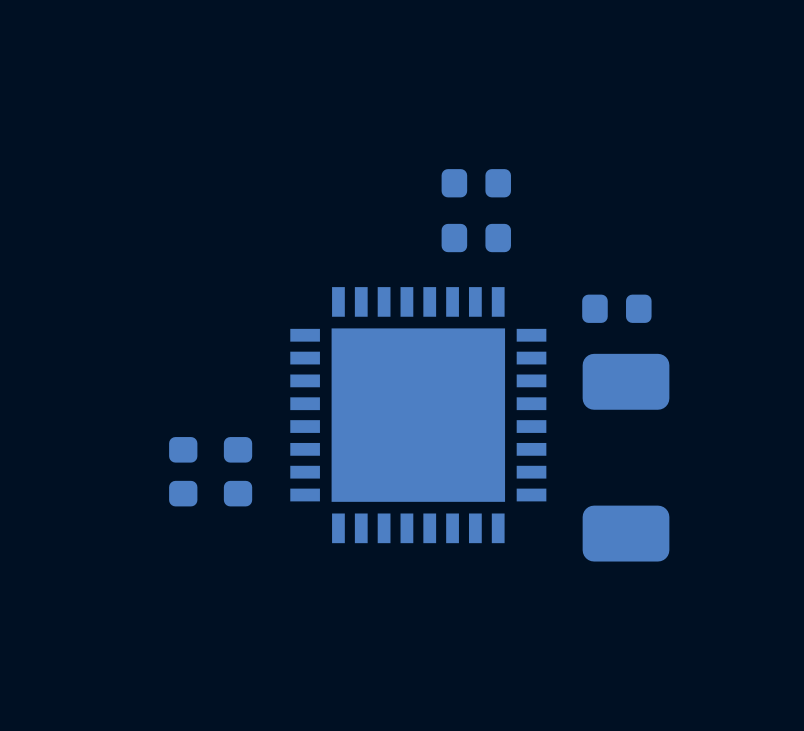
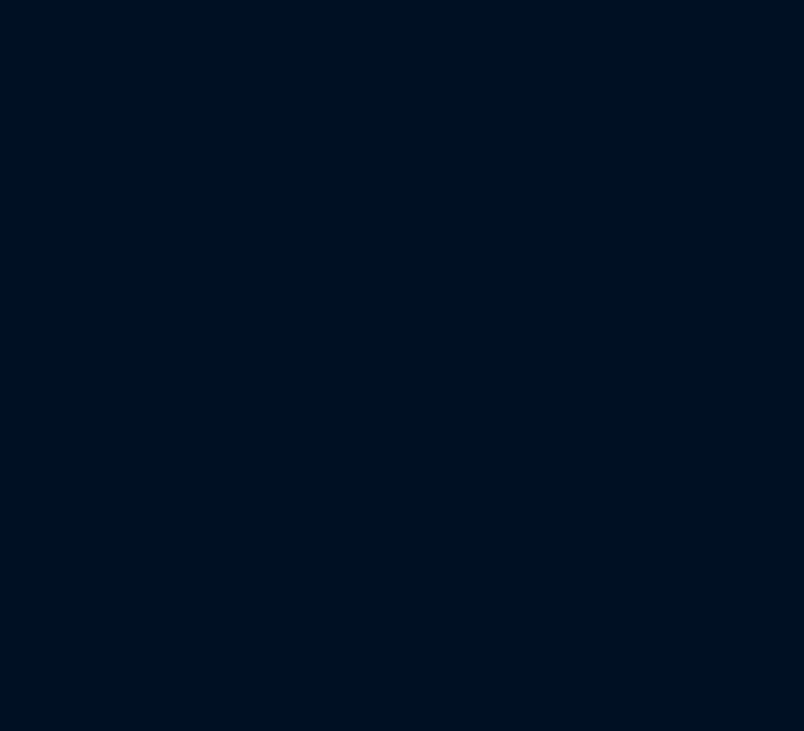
part: (476, 183) -> none
part: (476, 238) -> none
part: (616, 308) -> none
part: (418, 415) -> none
part: (626, 457) -> none
part: (183, 471) -> none
part: (238, 471) -> none

